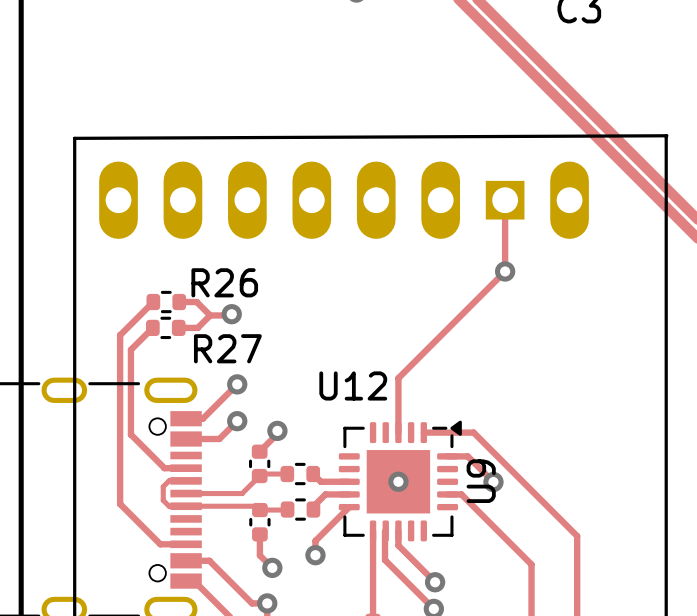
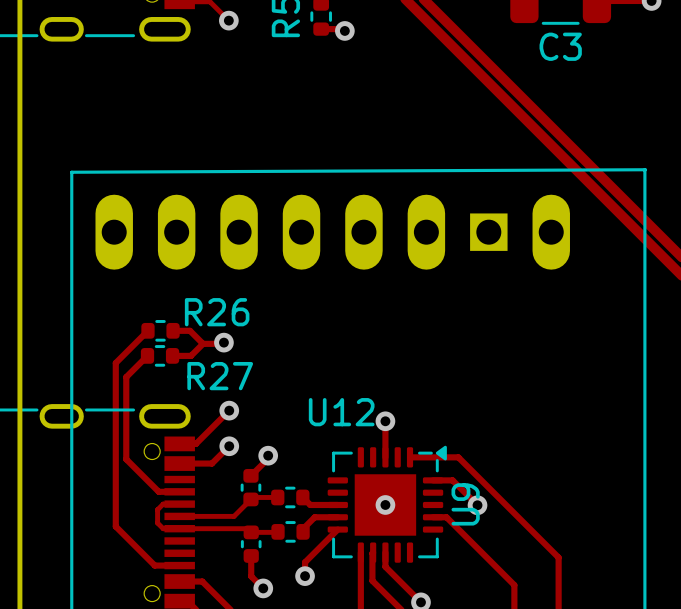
track: (505, 200) (505, 271) (398, 378) (398, 395) -> none
via: (505, 271) -> none
via: none -> (385, 421)

